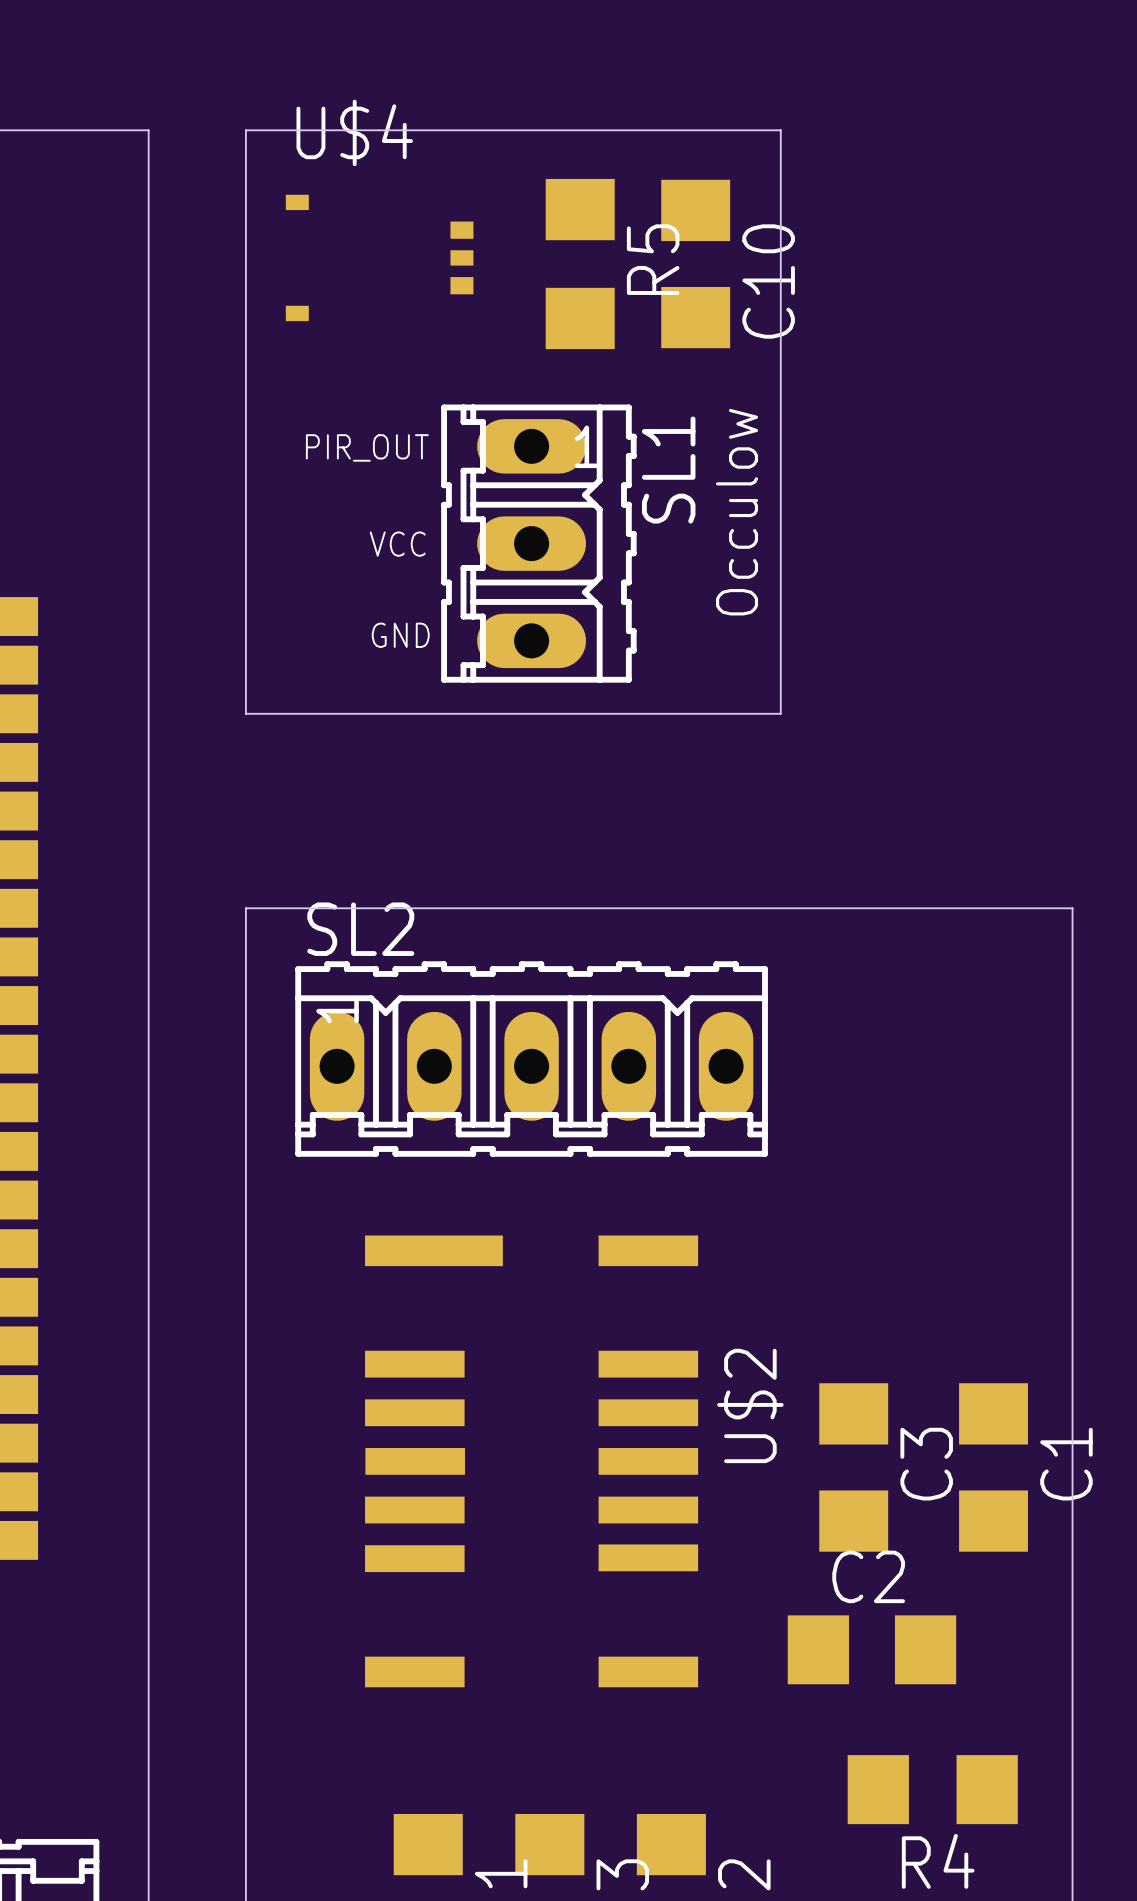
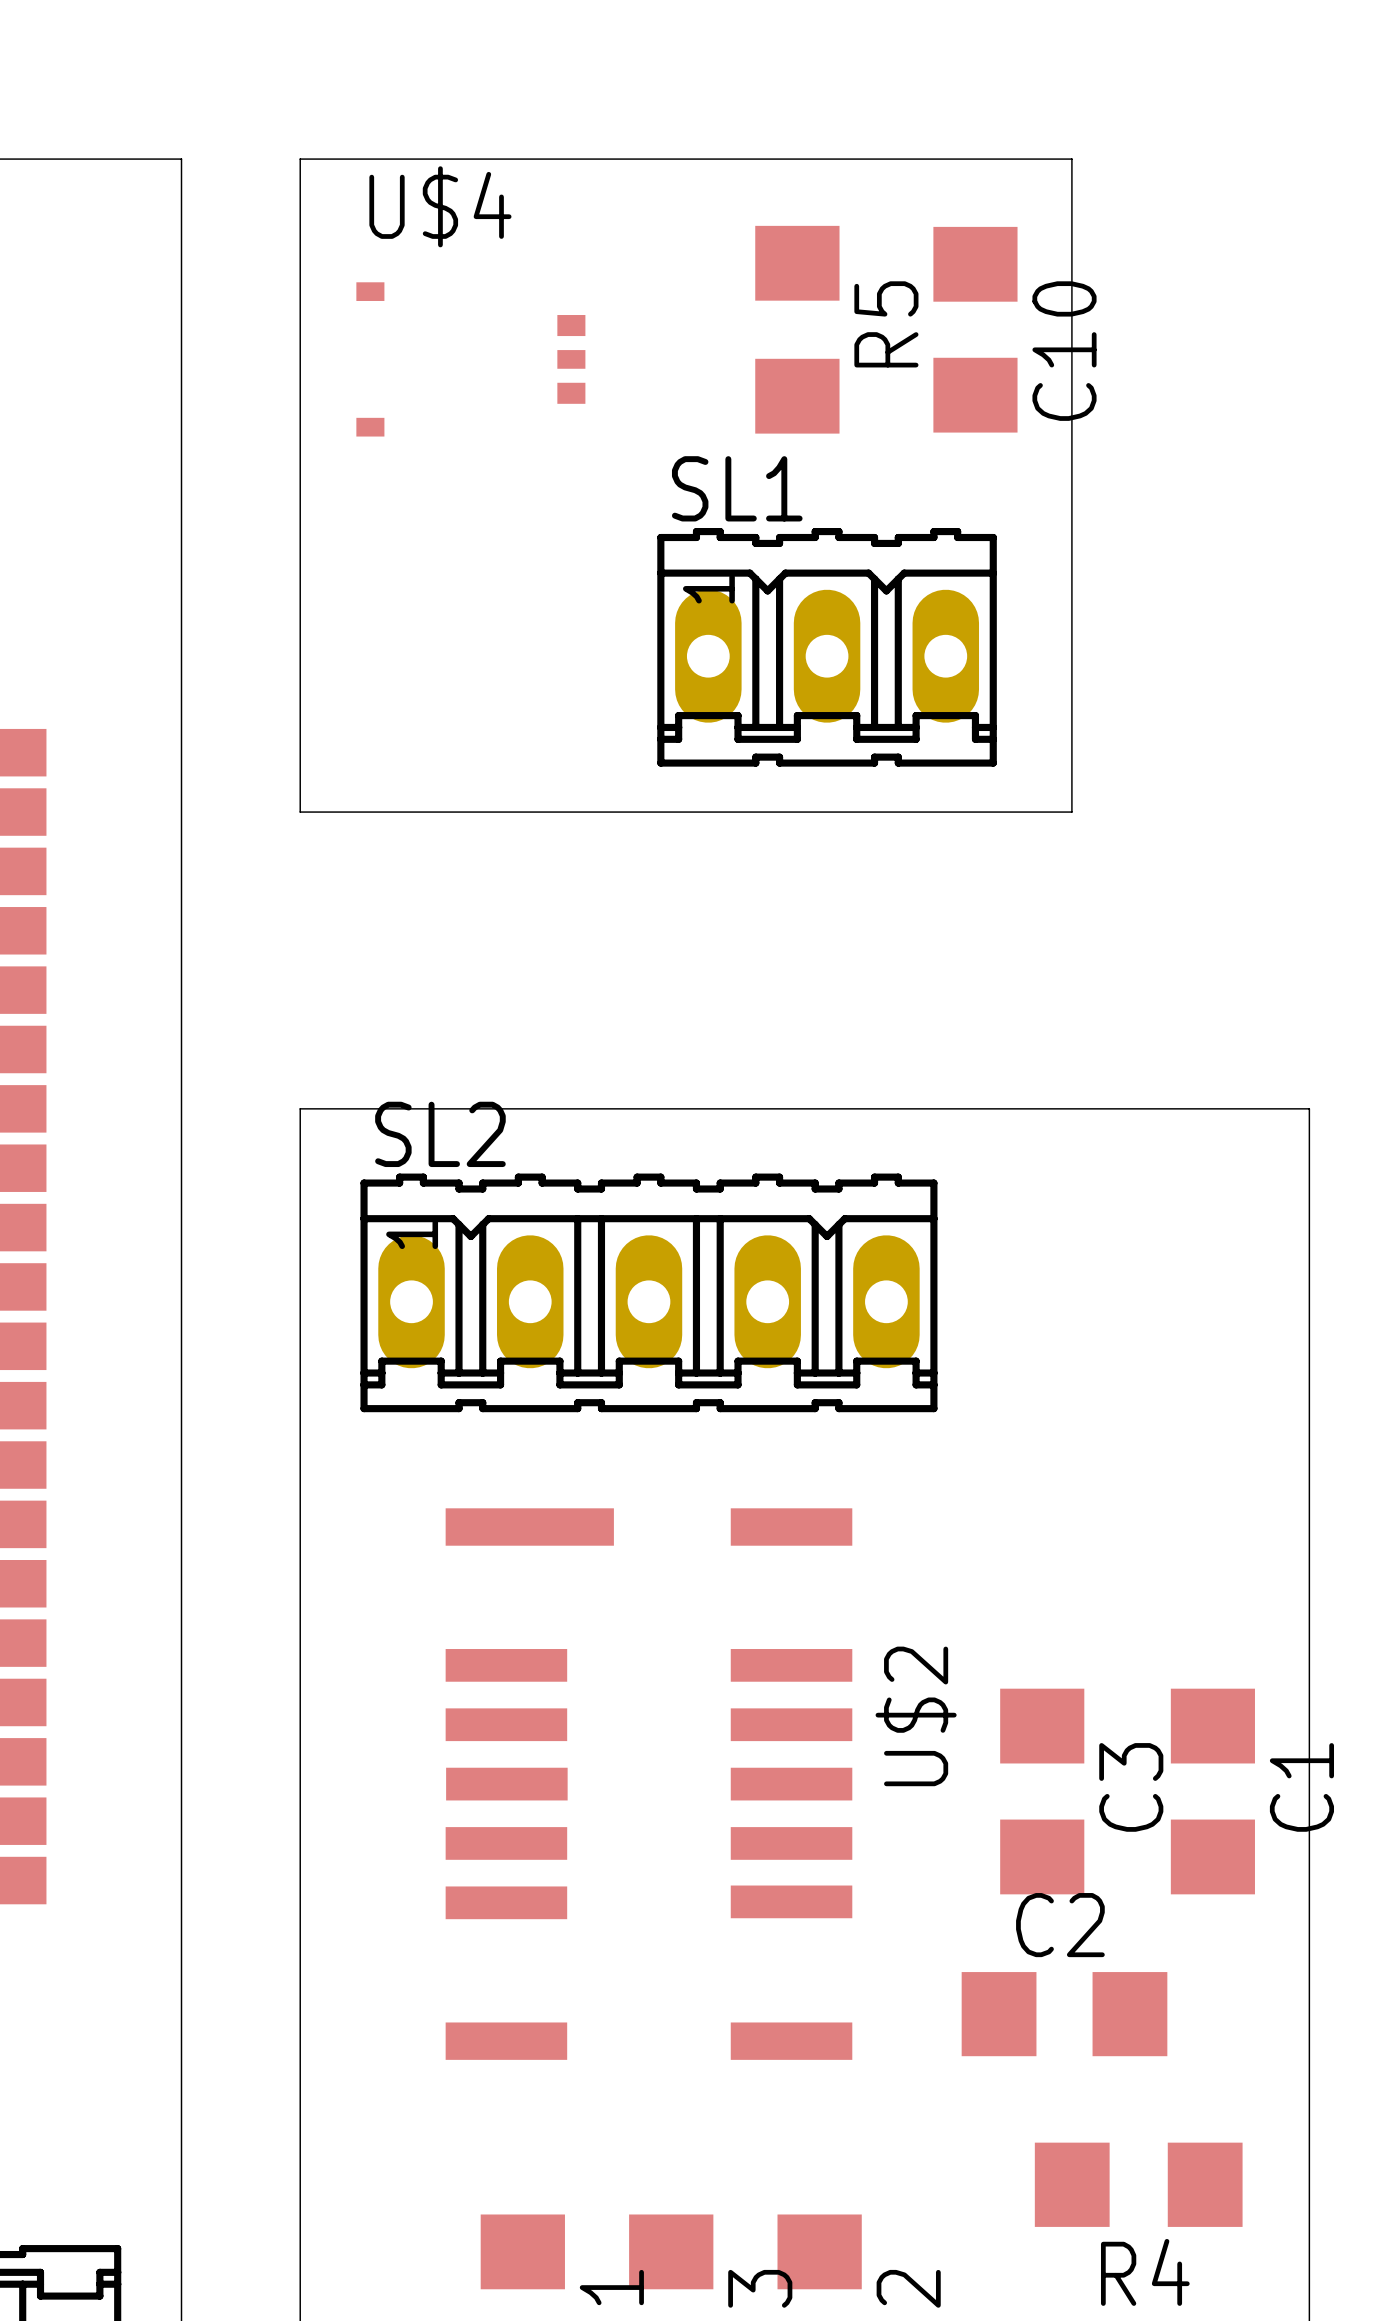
board edge: (780, 130) (780, 713) (245, 713) (245, 665) -> (953, 159) (1071, 159) (1071, 812) (300, 812)
U$4 position: (379, 257) -> (470, 359)
R5 position: (580, 264) -> (797, 329)
C10 position: (695, 264) -> (975, 329)
text: PIR_OUT (367, 447) -> none
text: Occulow (737, 512) -> none
SL1 rotation: 0° (538, 543) -> 90° counterclockwise (827, 647)
text: VCC (397, 544) -> none
text: GND (400, 635) -> none

